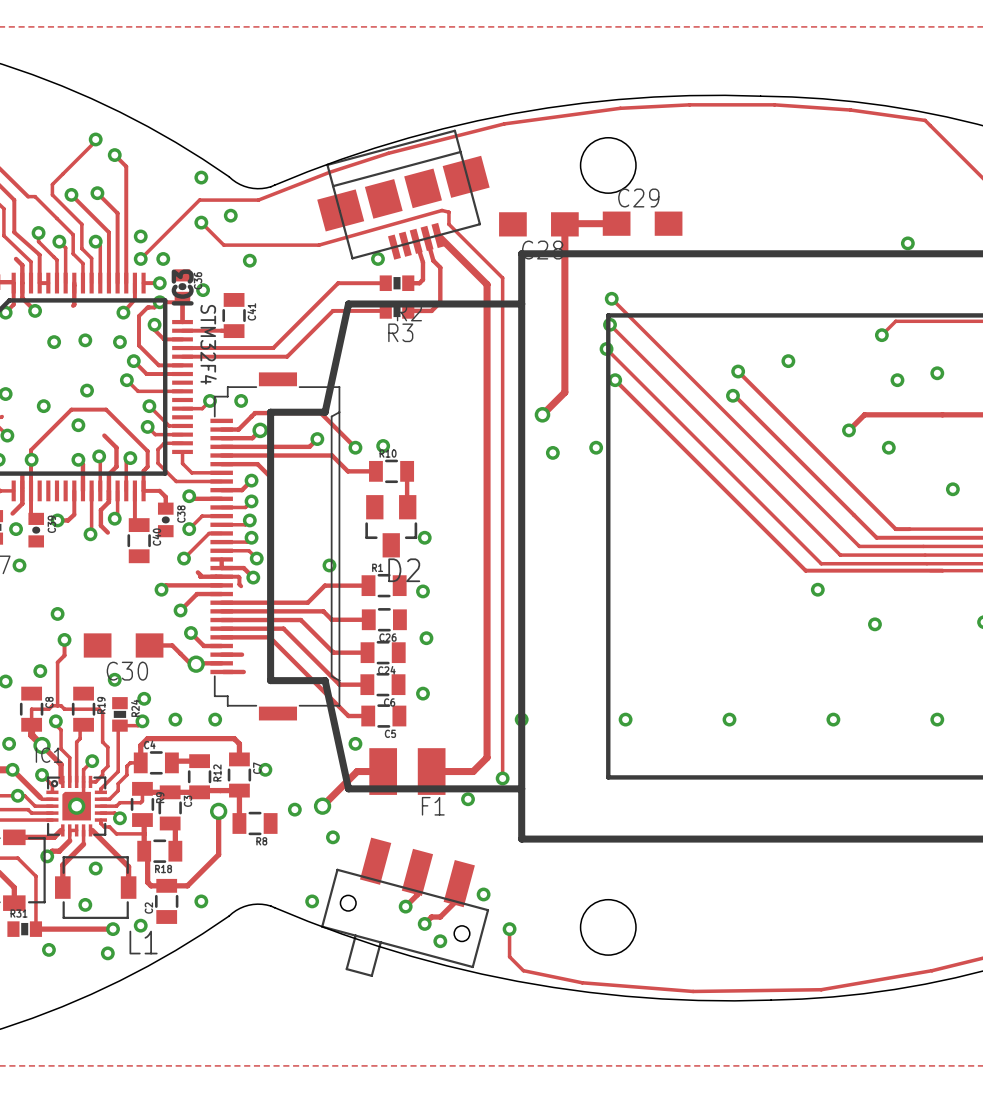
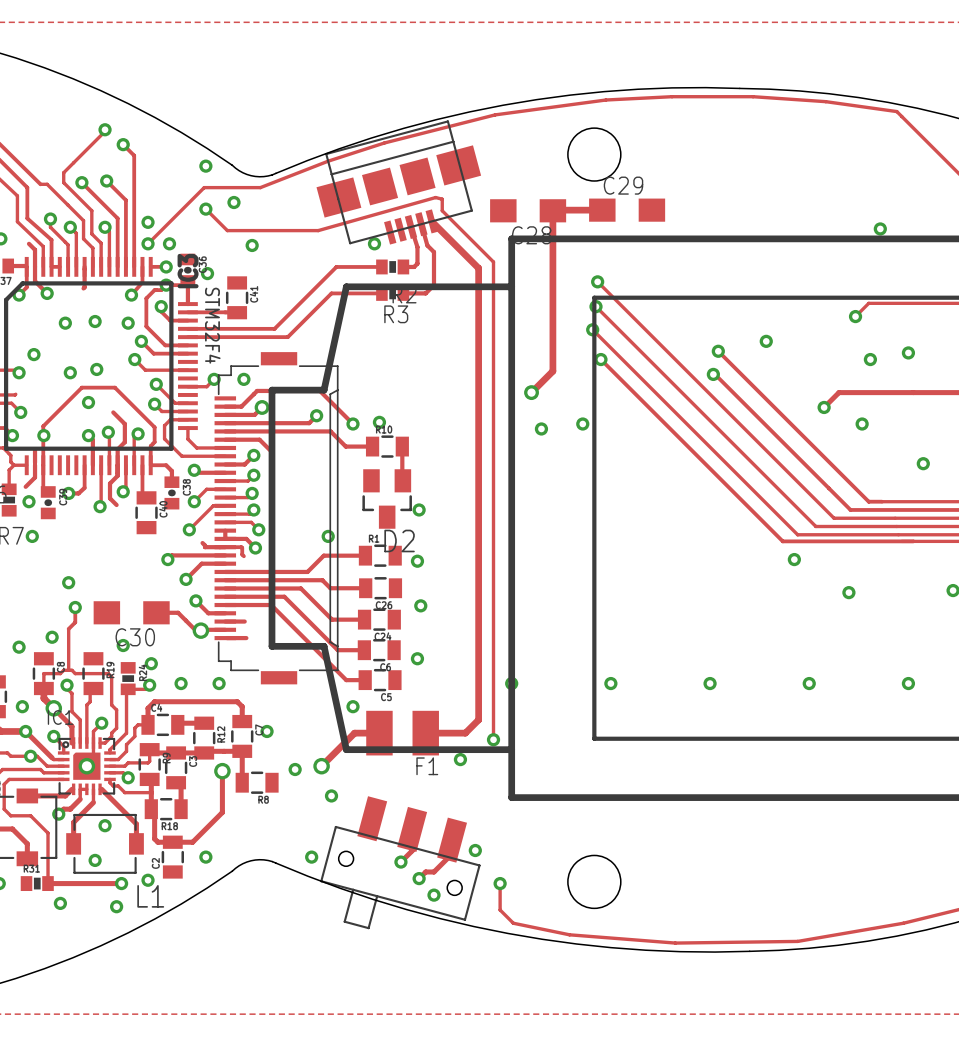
via: none -> (33, 354)
via: none -> (70, 372)
via: (43, 406) -> none

